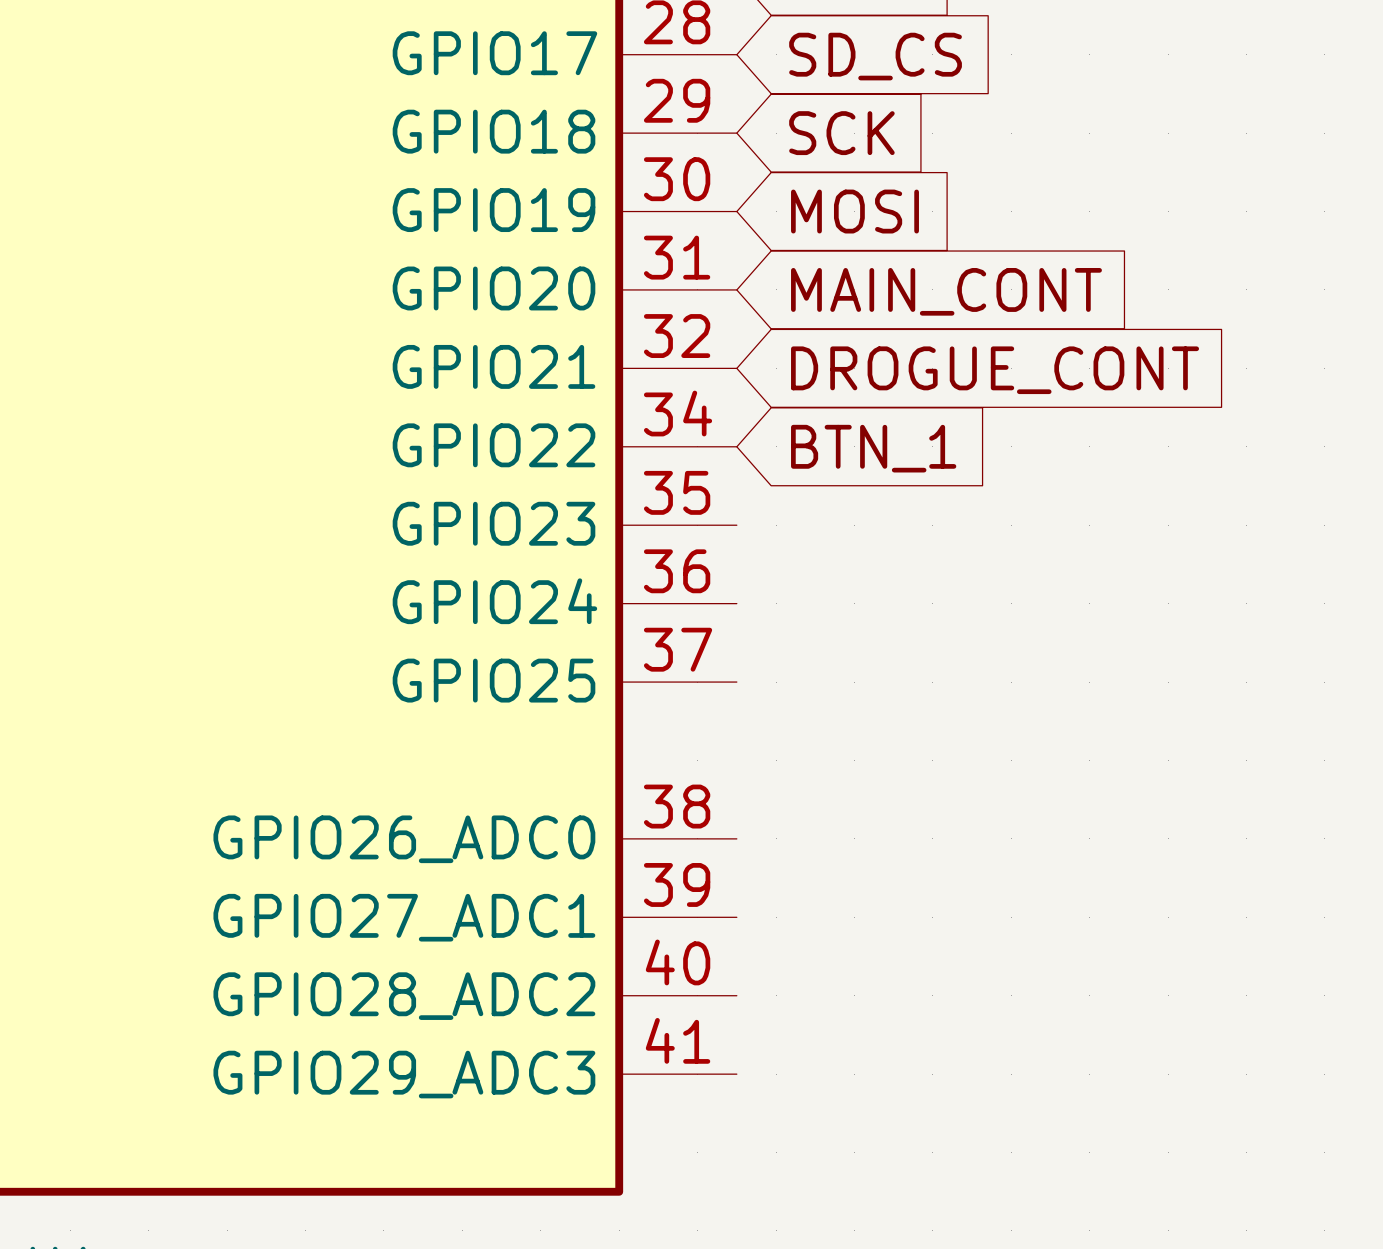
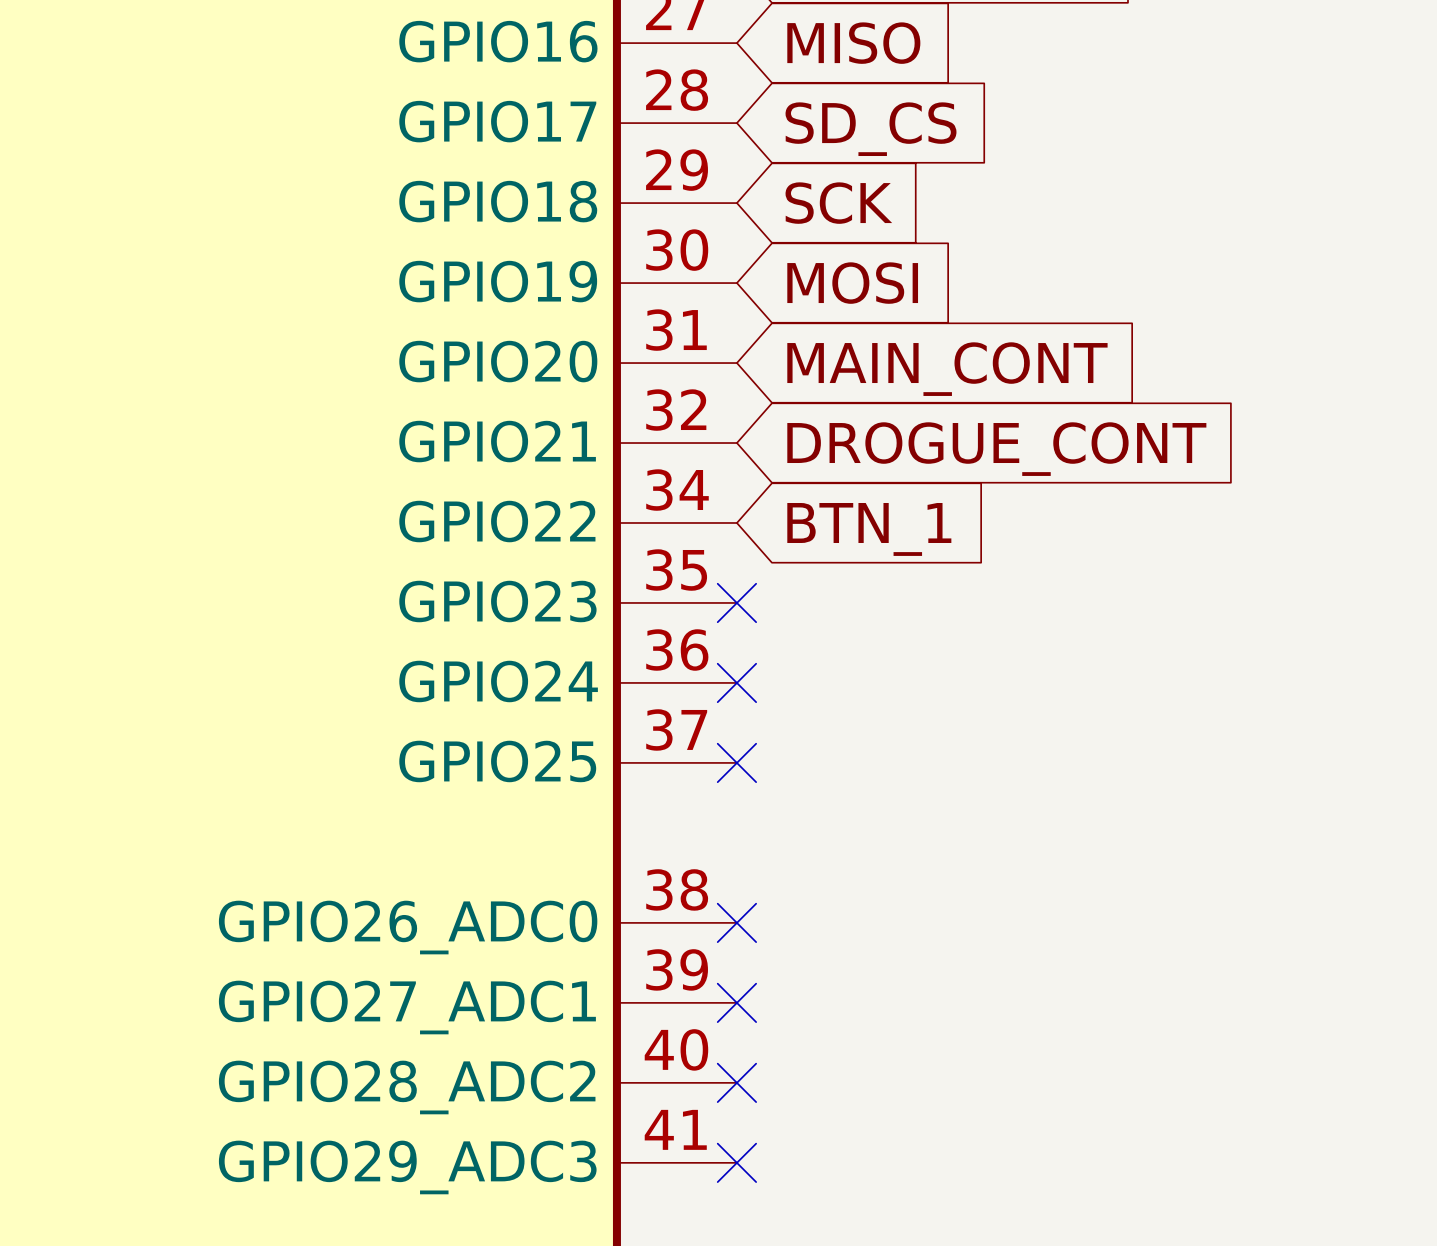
no-connect mark: none -> (736, 602)
no-connect mark: none -> (736, 682)
no-connect mark: none -> (736, 762)
no-connect mark: none -> (736, 922)
no-connect mark: none -> (736, 1002)
no-connect mark: none -> (736, 1082)
no-connect mark: none -> (736, 1162)

